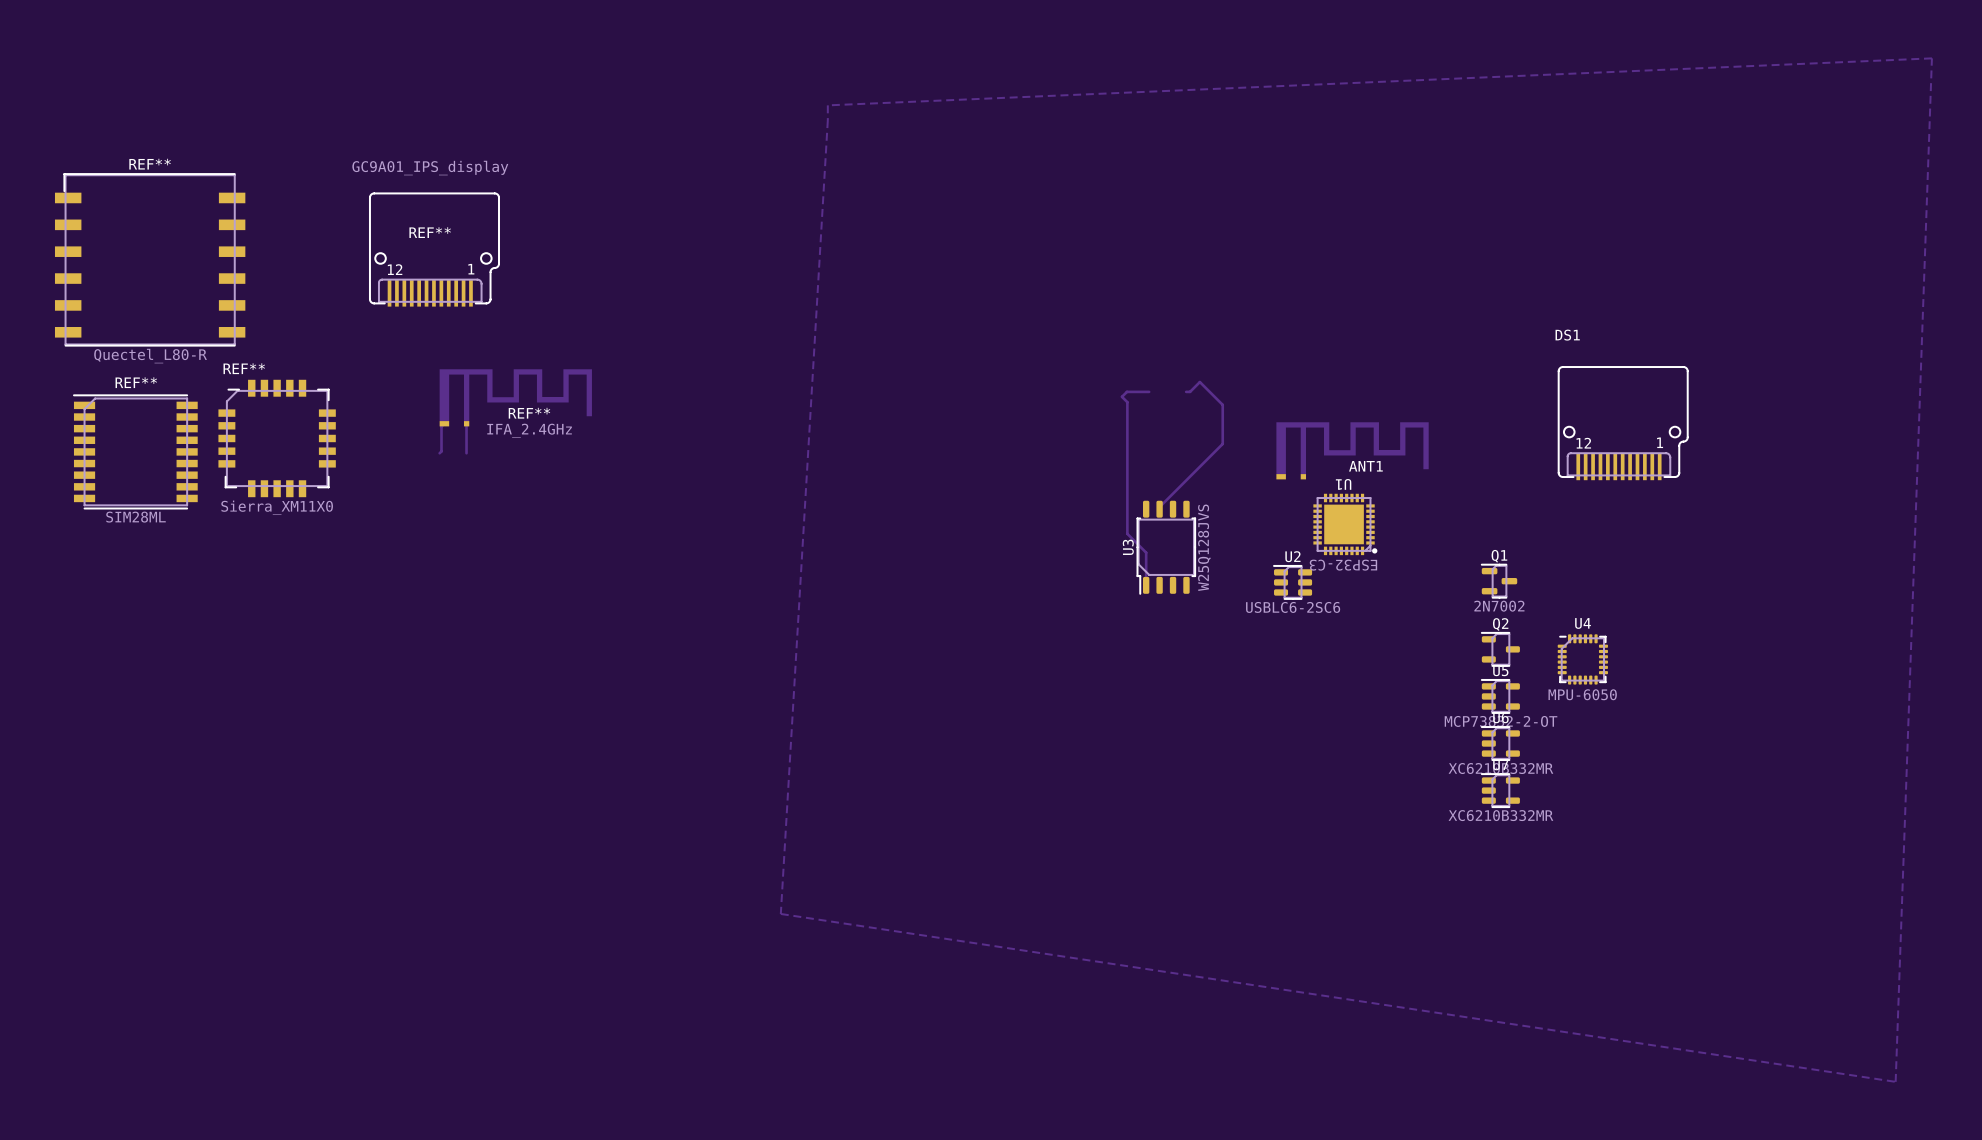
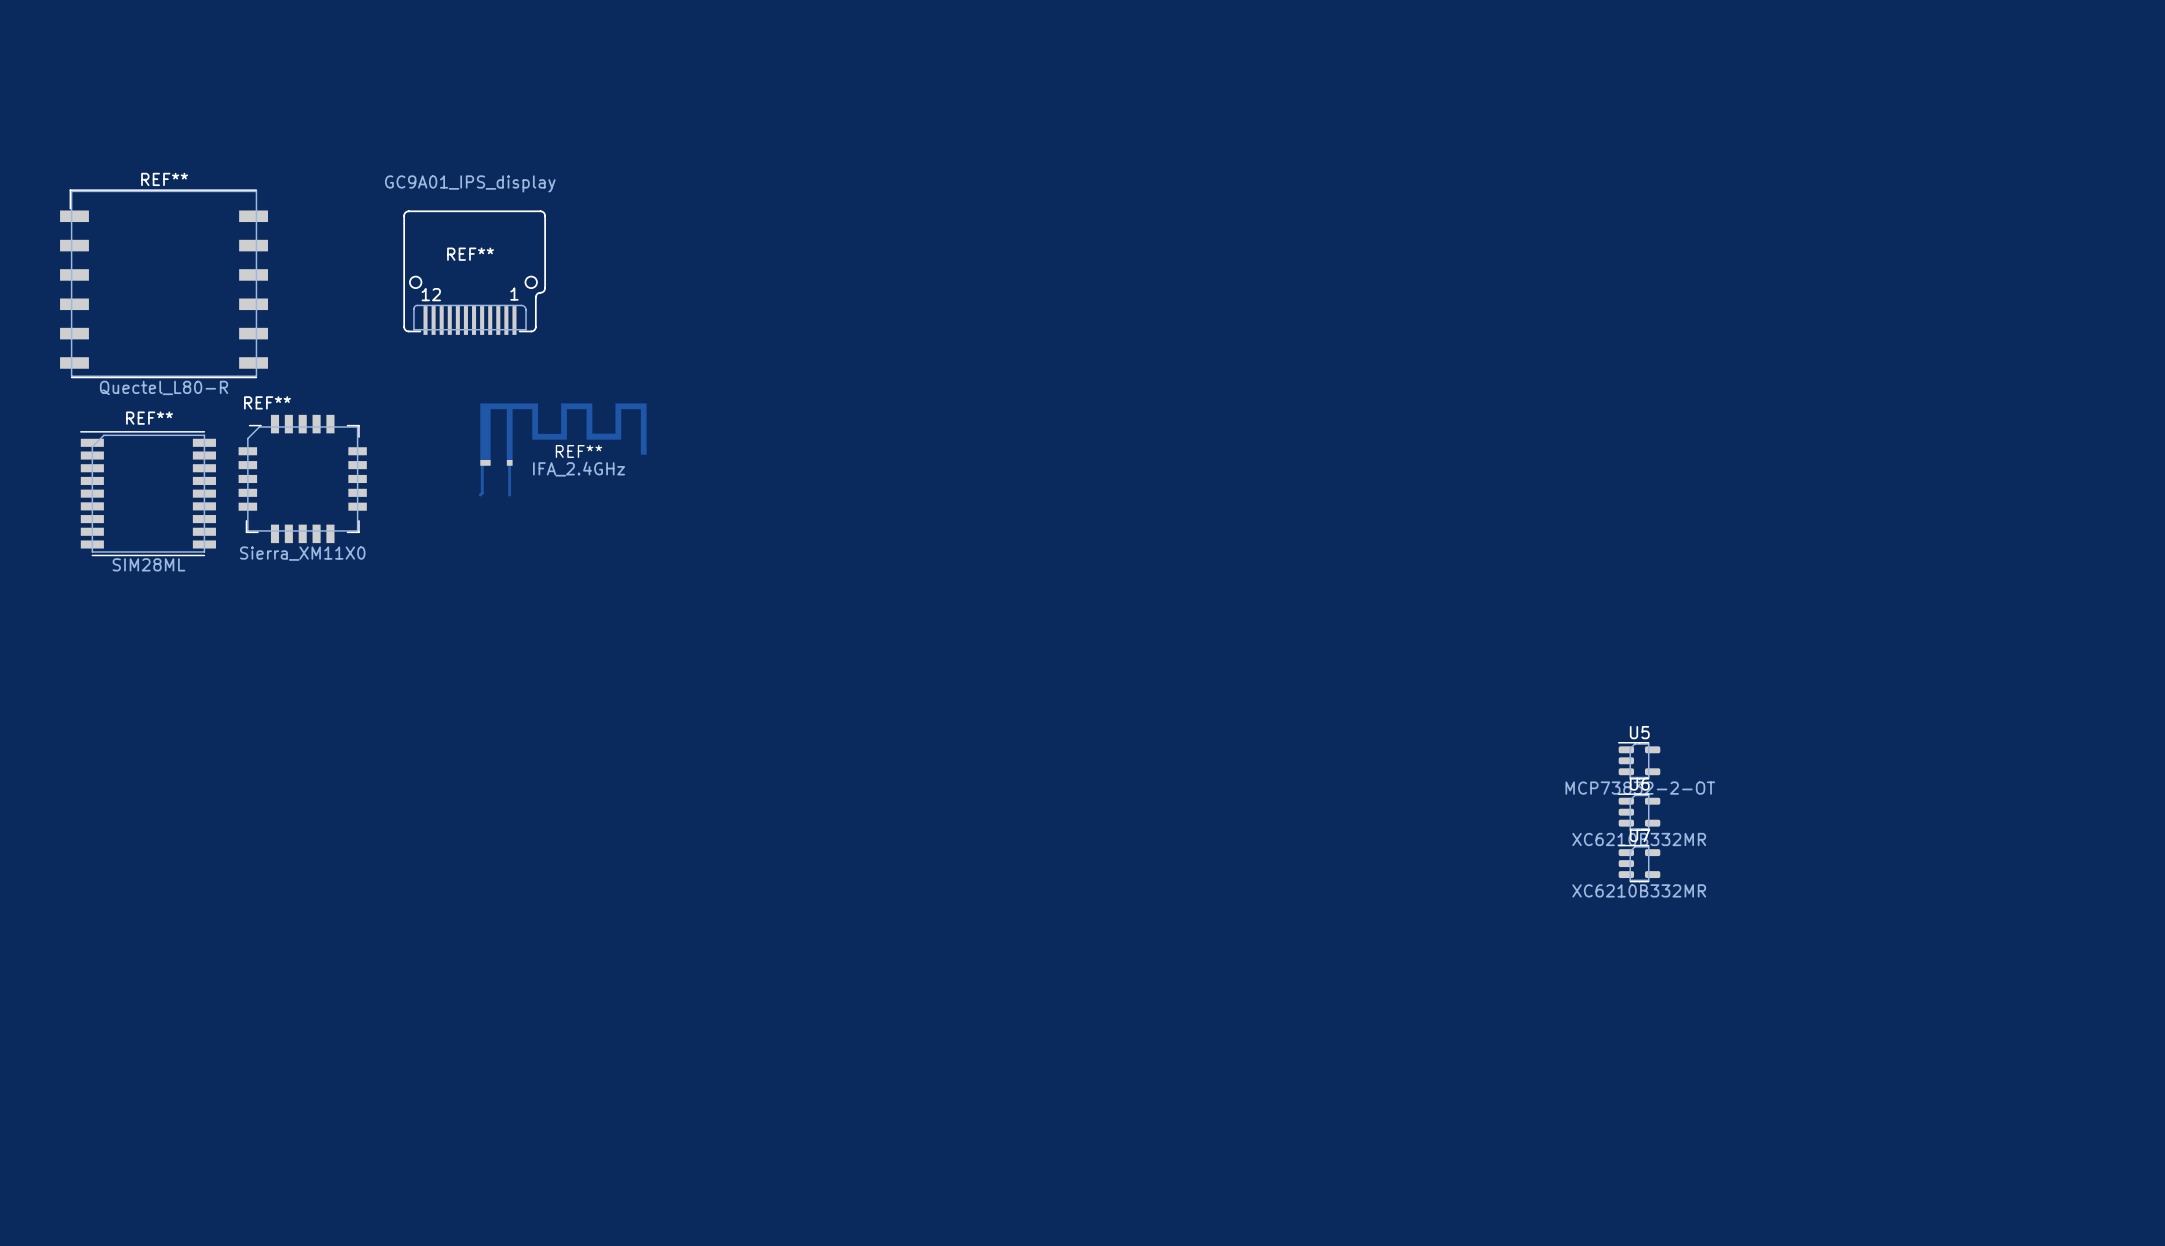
zone outline: (1931, 58) (1895, 1081) (780, 913) (827, 105) (1931, 58) -> none
track: (1149, 391) (1126, 391) (1121, 396) (1127, 402) (1127, 533) (1146, 552) (1146, 585) -> none
track: (1186, 391) (1190, 391) (1199, 382) (1222, 404) (1222, 443) (1159, 509) -> none
DS1: (1623, 423) -> none
ANT1: (1352, 450) -> none
U1: ESP32-C3 (1345, 524) -> none
U3: W25Q128JVS (1166, 547) -> none
Q1: 2N7002 (1499, 581) -> none
U2: USBLC6-2SC6 (1292, 582) -> none
Q2: (1500, 649) -> none
U4: MPU-6050 (1582, 659) -> none

